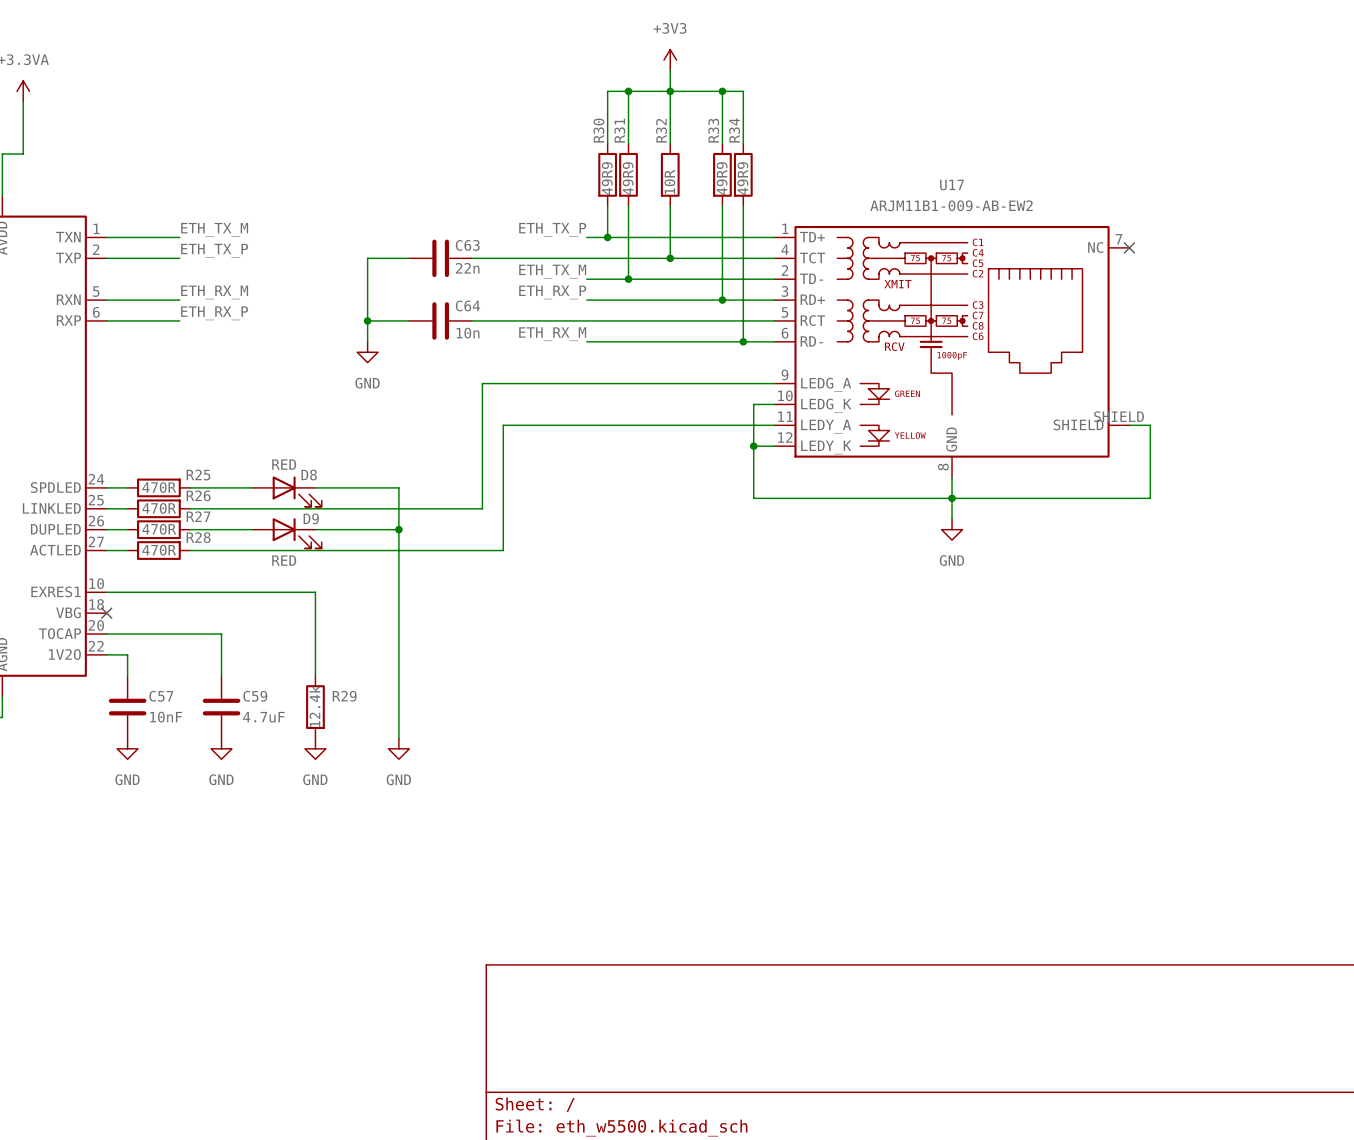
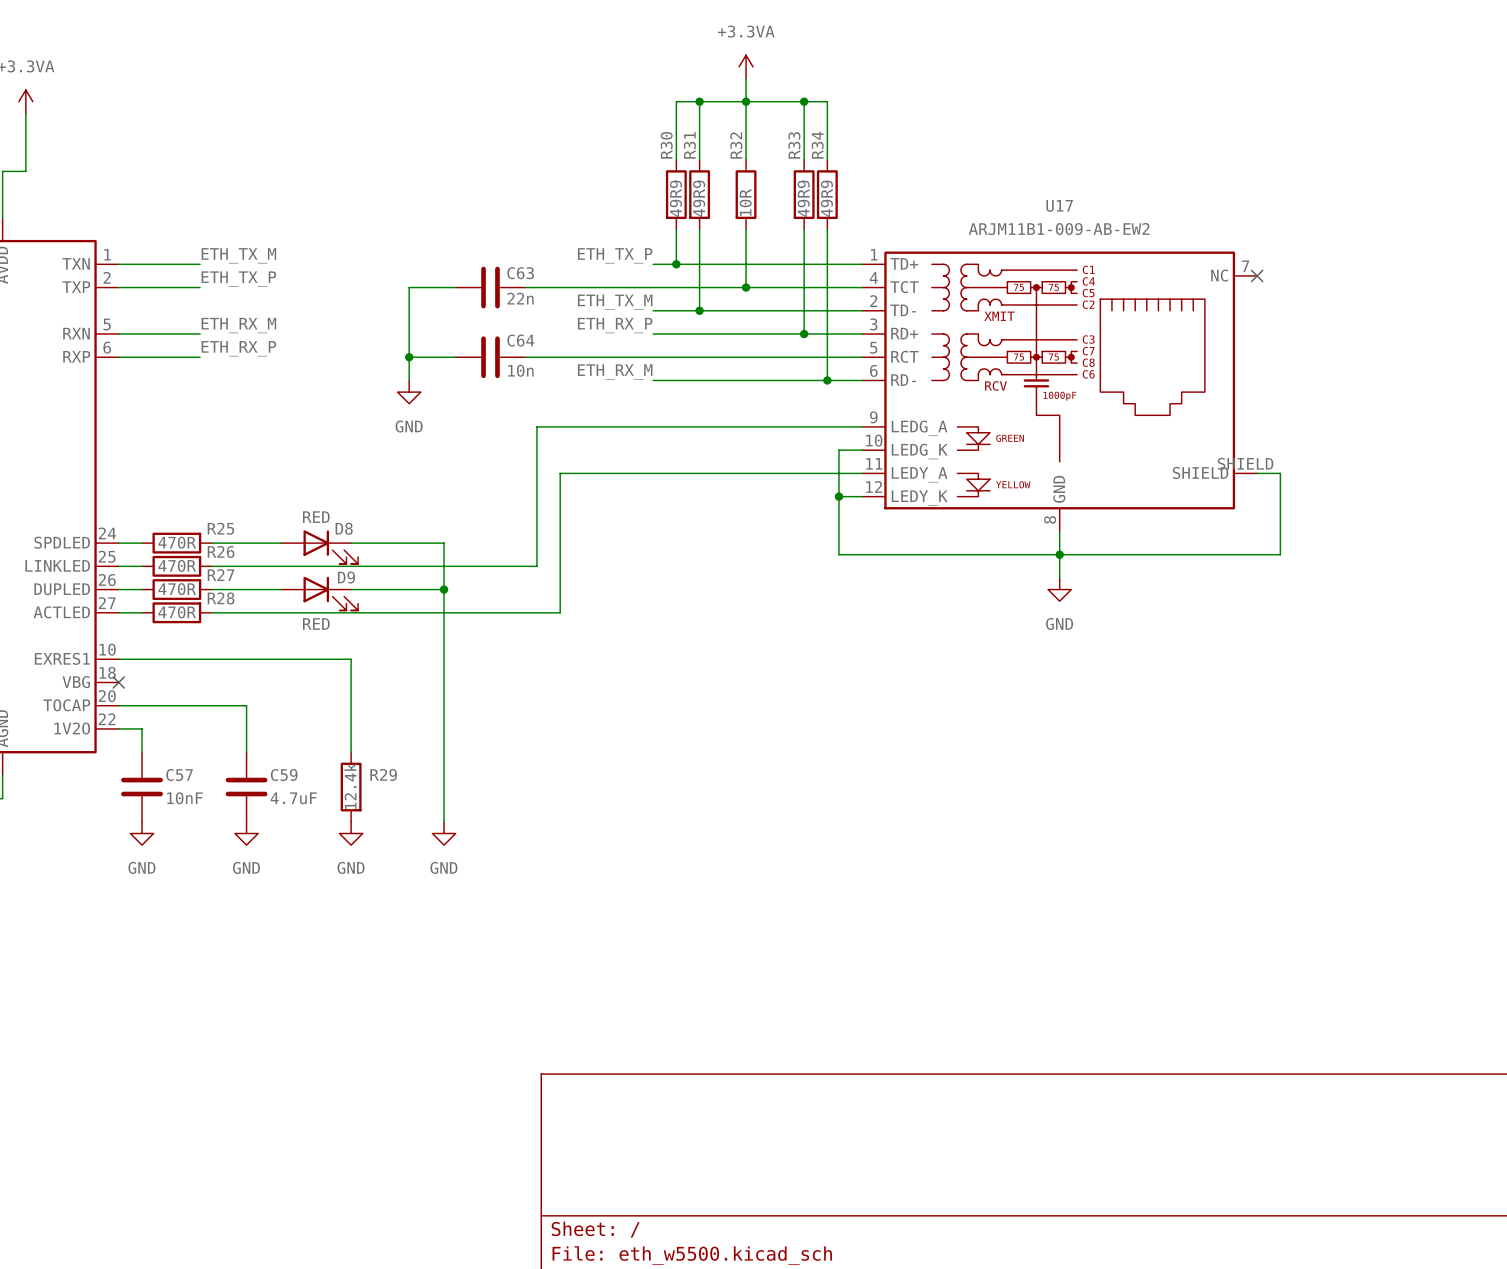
power symbol: +3V3 (670, 60) -> +3.3VA (746, 66)

